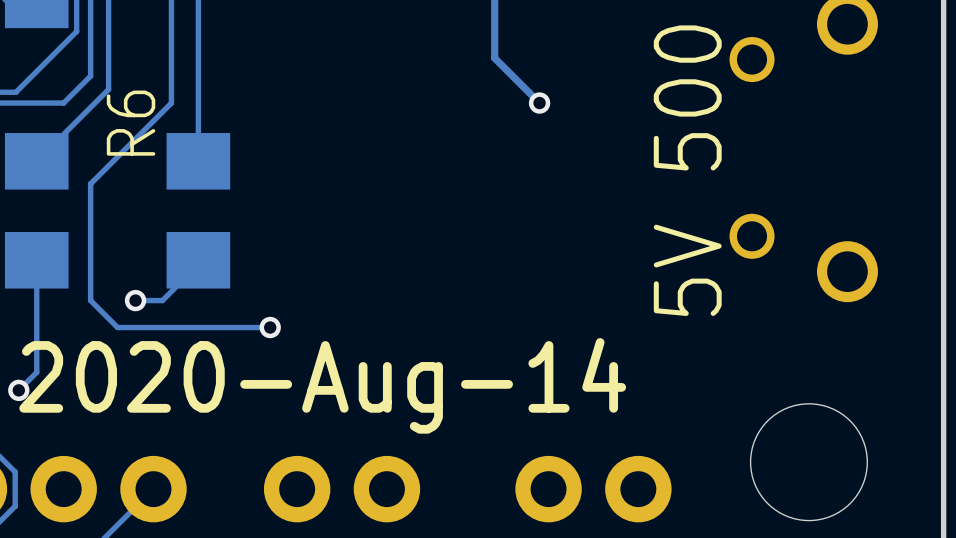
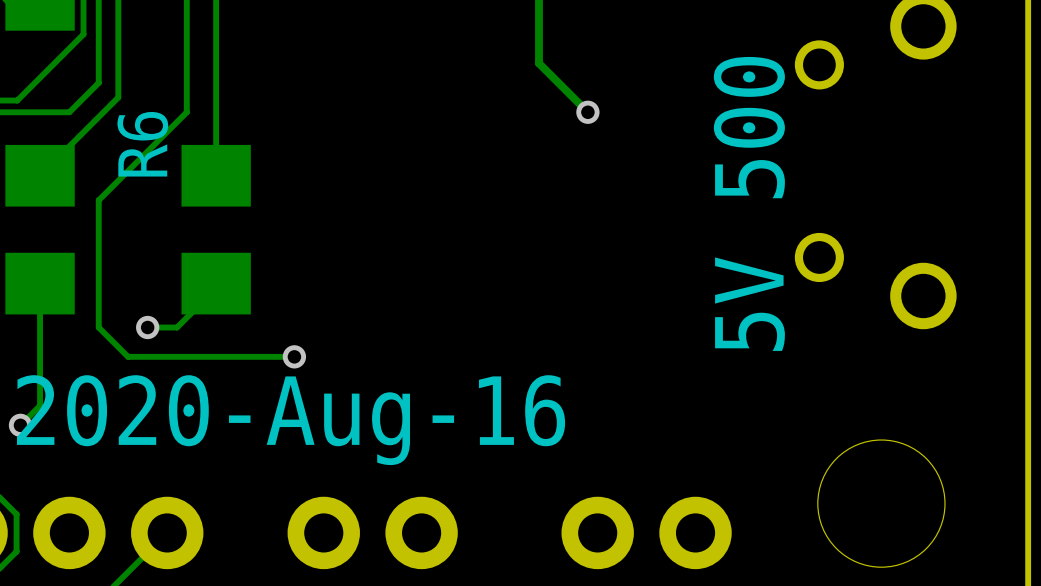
text: 2020-Aug-14 (322, 385) -> 2020-Aug-16 (291, 420)

